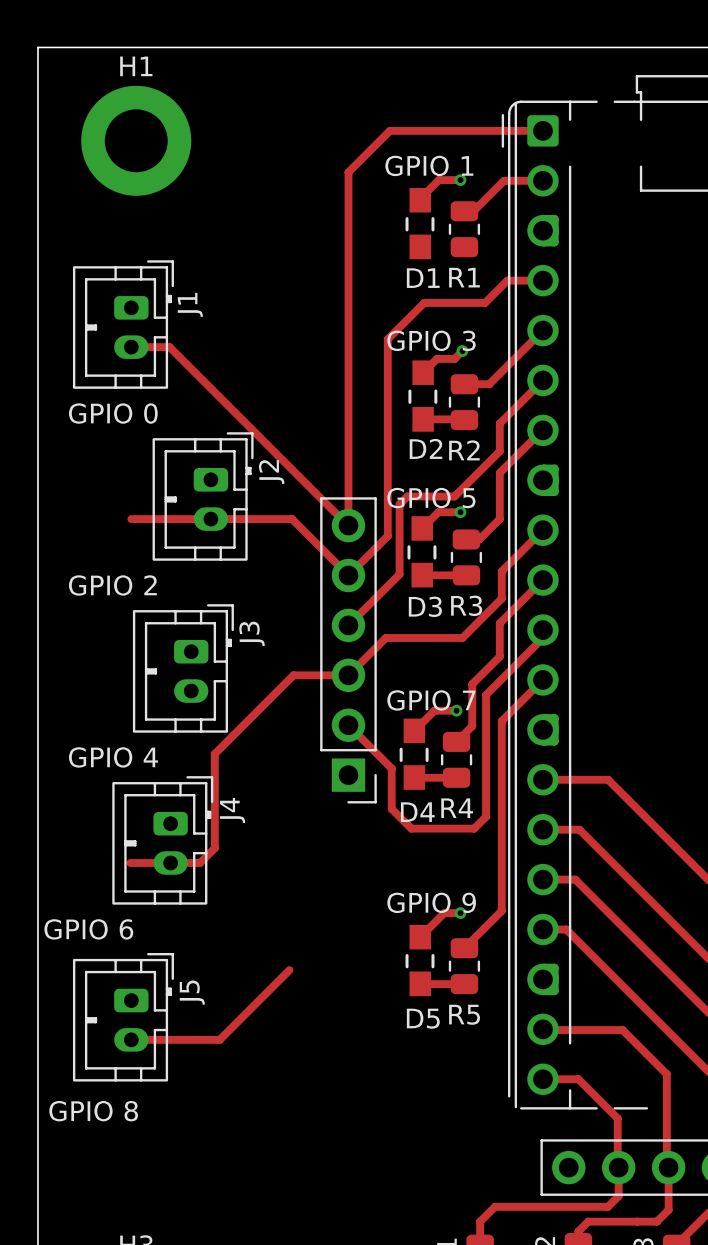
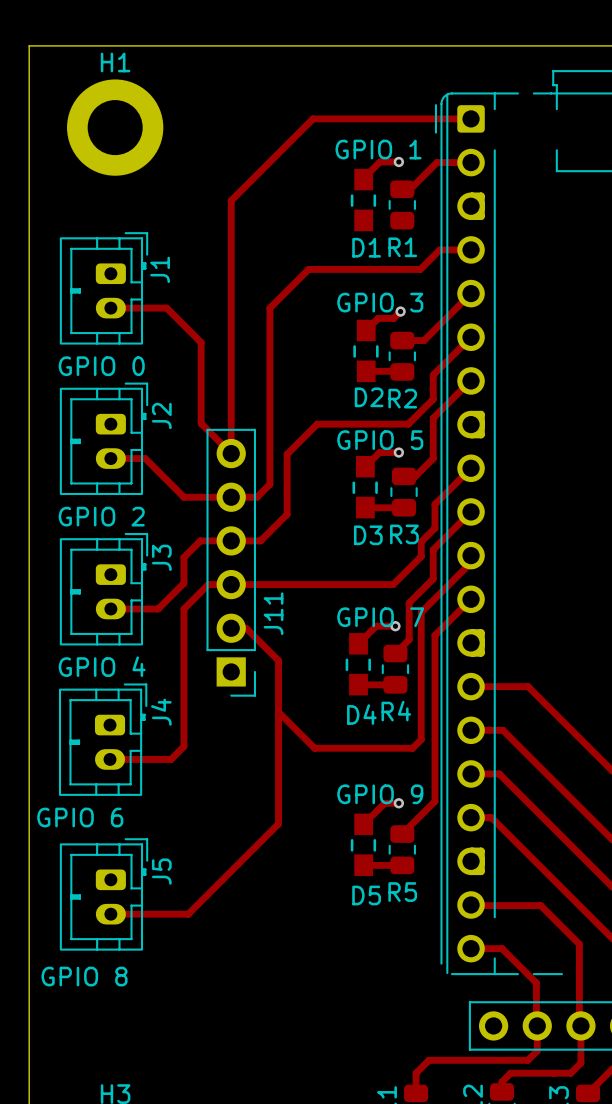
track: (389, 130) (348, 172) (348, 525) -> (337, 118) (312, 118) (231, 200) (231, 453) (201, 423) (201, 342) (166, 308) (144, 308)
track: (424, 302) (387, 339) (387, 536) (348, 575) (292, 519) (170, 519) -> (367, 269) (308, 269) (269, 308) (269, 484) (257, 497) (183, 497) (145, 458)
track: (169, 347) (348, 525) -> none
track: (471, 479) (454, 496) (407, 496) (399, 504) (399, 574) (348, 625) -> (408, 424) (317, 424) (287, 454) (287, 514) (260, 540) (200, 540) (183, 557) (183, 583) (158, 609) (110, 609)
J2 position: (203, 496) -> (104, 438)
track: (486, 614) (462, 637) (385, 637) (348, 675) (293, 675) (214, 753) -> (421, 541) (421, 556) (393, 584) (208, 584) (183, 609) (183, 664)
J11: none -> (231, 562)
part: (348, 650) -> none
J3 position: (183, 668) -> (104, 589)
track: none -> (231, 628) (246, 628) (278, 660) (278, 823) (249, 853)
track: (348, 725) (391, 768) (391, 808) (411, 828) (474, 828) (486, 816) -> (278, 712) (314, 748) (412, 748) (421, 739) (421, 719)
J4 position: (162, 840) -> (103, 739)

